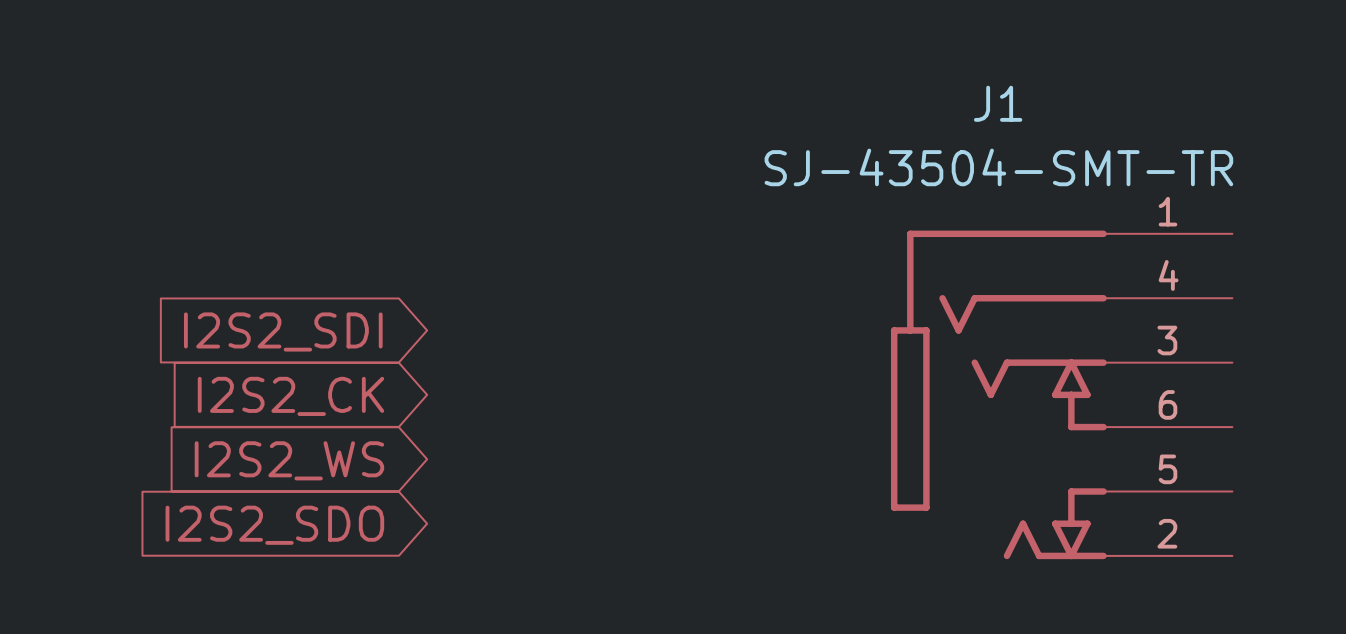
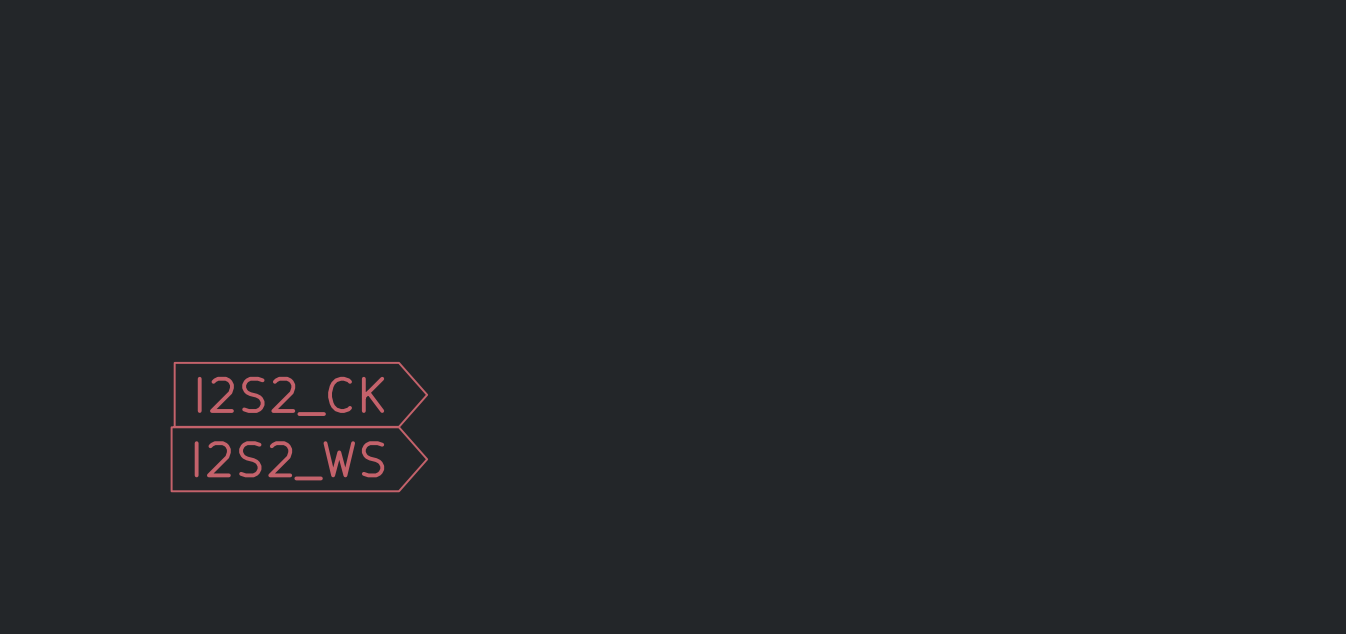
global label: I2S2_SDI (283, 331) -> none
J1: SJ-43504-SMT-TR (1061, 394) -> none
global label: I2S2_SDO (274, 525) -> none

